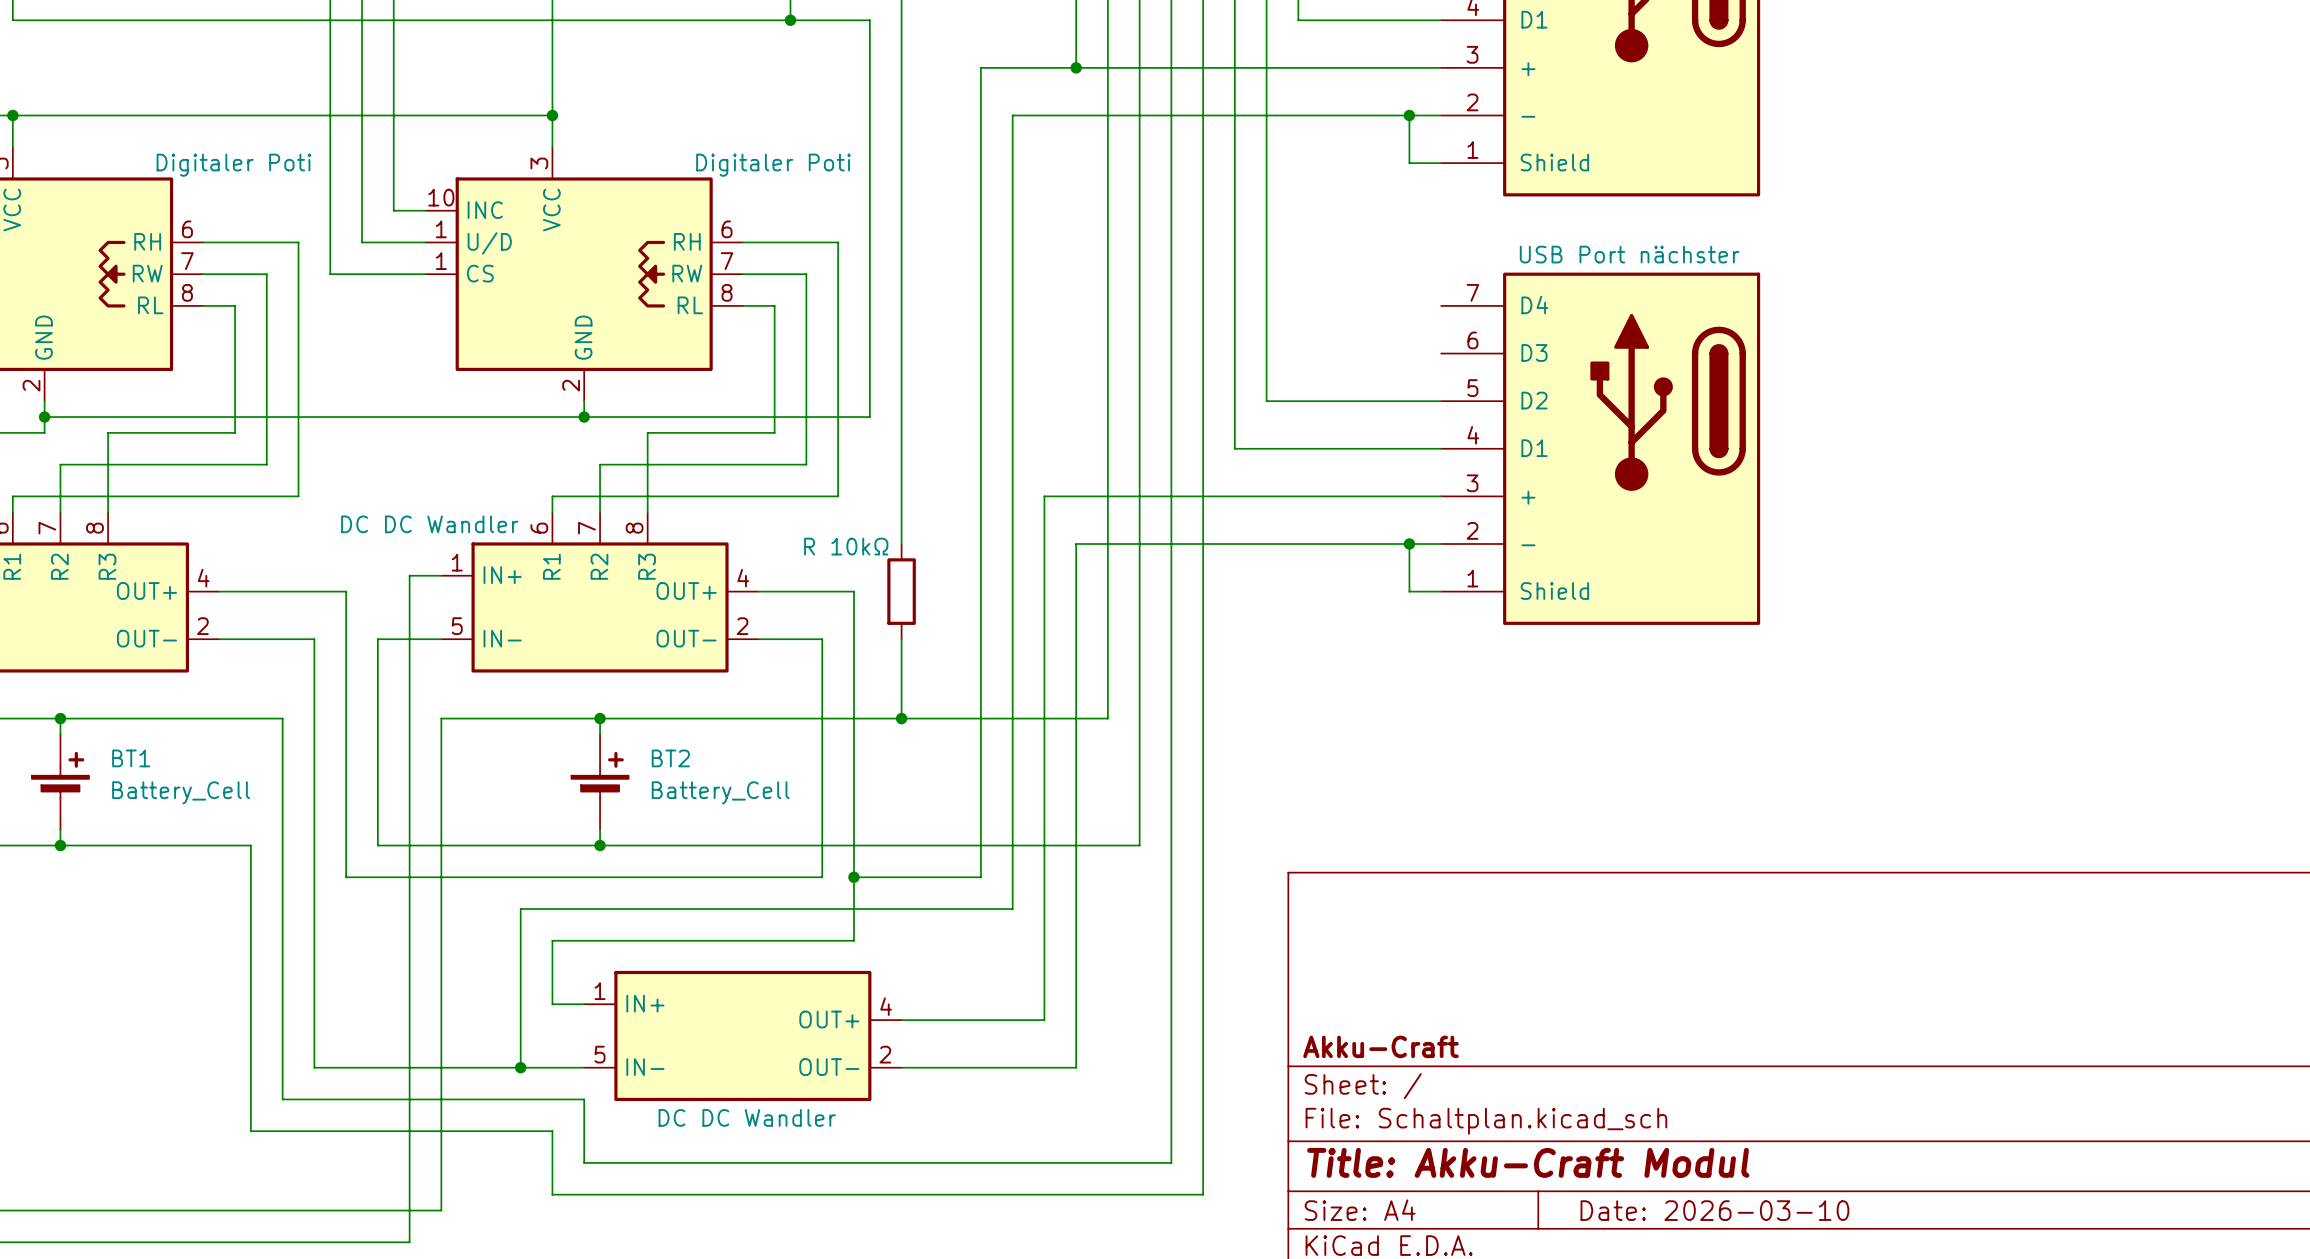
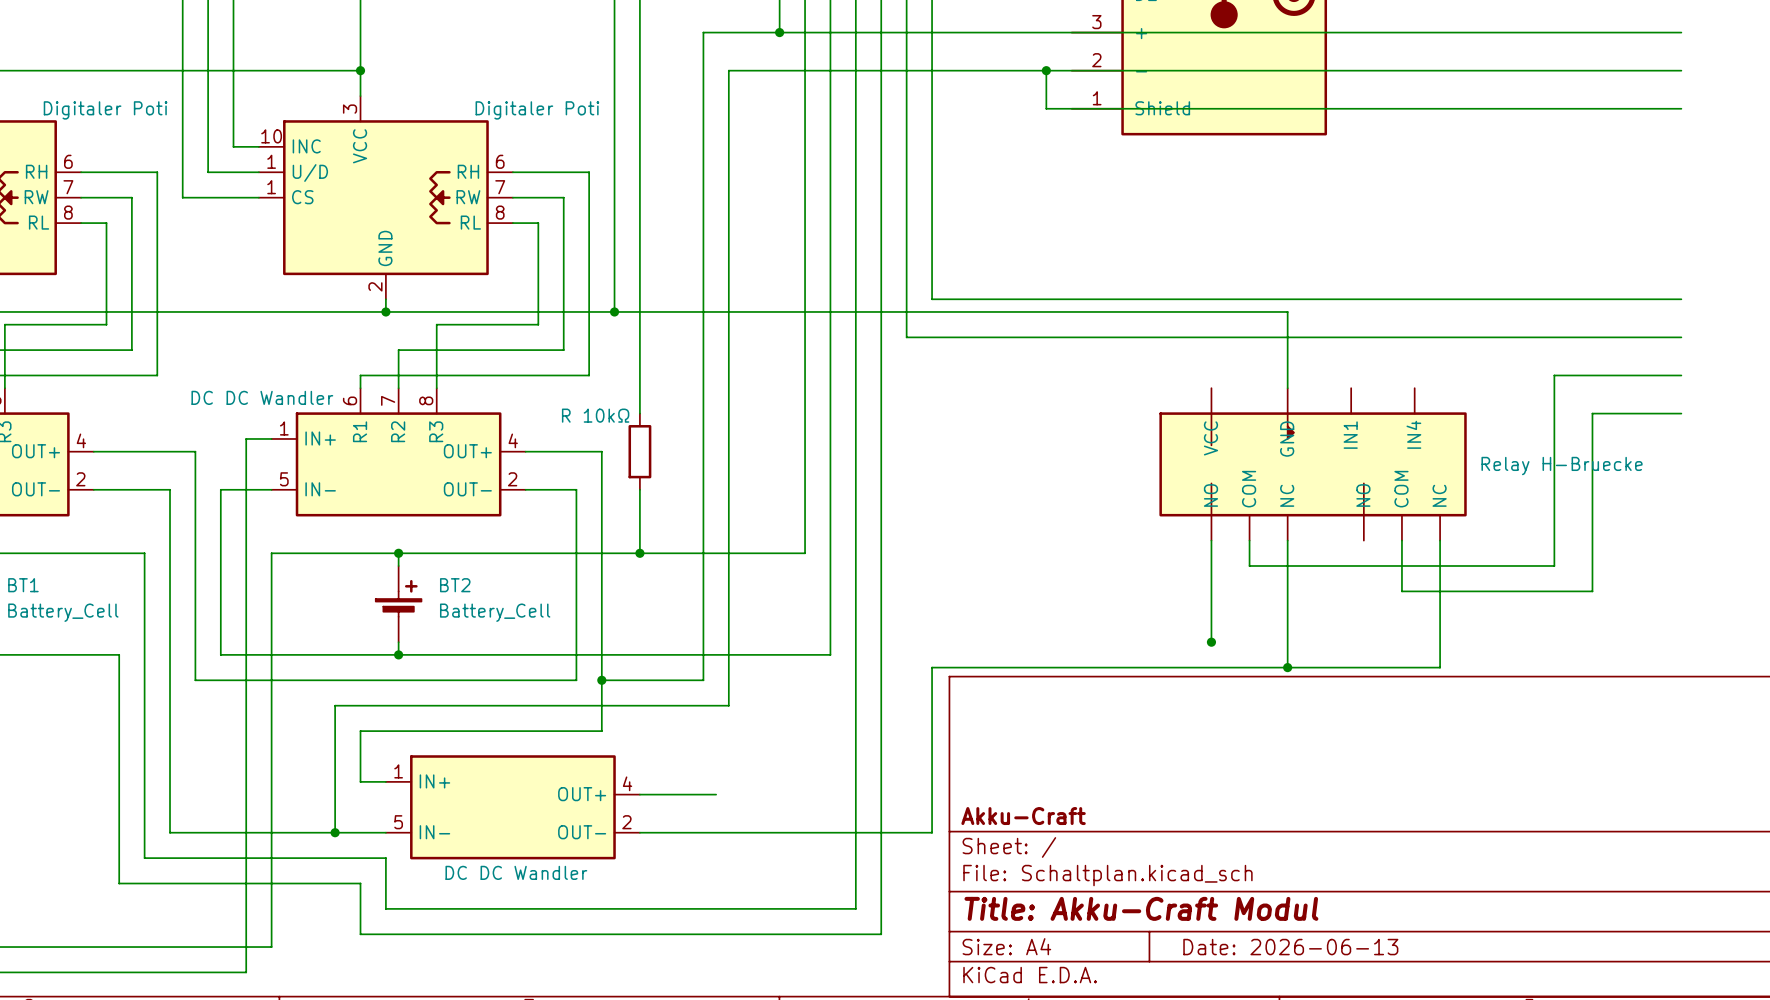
wire: none -> (1071, 32) (1681, 32)
wire: none -> (1071, 70) (1681, 70)
wire: none -> (1071, 108) (1681, 108)
wire: none -> (1071, 299) (1681, 299)
wire: none -> (614, 311) (1287, 311) (1287, 388)
junction: none -> (614, 311)
wire: none -> (1071, 337) (1681, 337)
part: USB Port nächster (1600, 448) -> none
wire: (1441, 496) (1044, 496) (1044, 1020) (996, 1020) -> none
wire: none -> (1681, 375) (1554, 375) (1554, 565) (1249, 565) (1249, 540)
wire: (1409, 543) (1409, 591) (1441, 591) -> none
junction: (1409, 543) -> none
wire: (1441, 543) (1076, 543) (1076, 1067) -> (1440, 540) (1440, 667) (932, 667) (932, 832) (779, 832)
wire: none -> (1681, 413) (1592, 413) (1592, 591) (1401, 591) (1401, 540)
part: none -> Relay H-Bruecke (1313, 464)
wire: none -> (1211, 540) (1211, 642)
wire: none -> (1287, 540) (1287, 667)
junction: none -> (1211, 642)
junction: none -> (1287, 667)
title block: Date: 2026-03-10 (1714, 1210) -> Date: 2026-06-13 (1290, 947)

